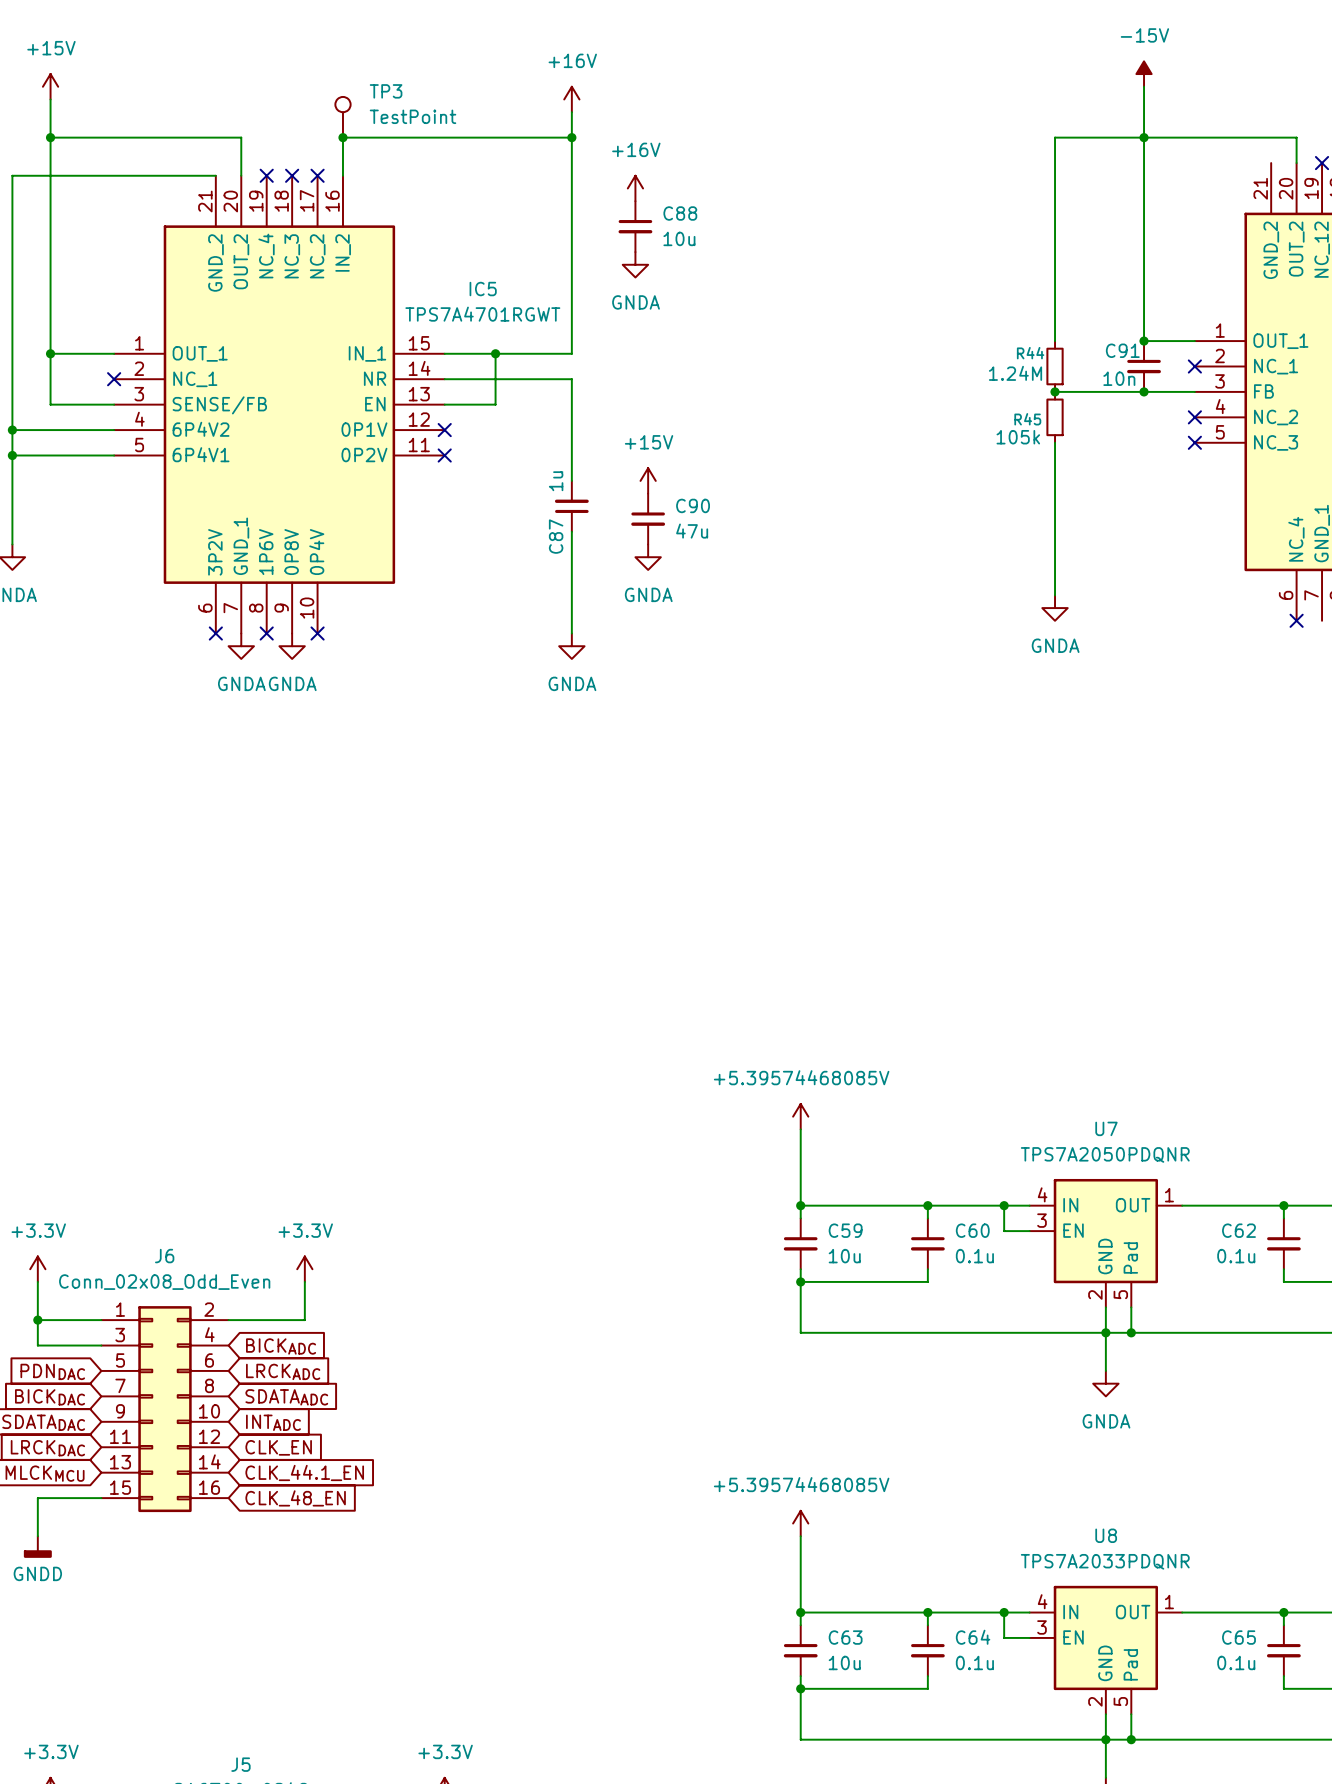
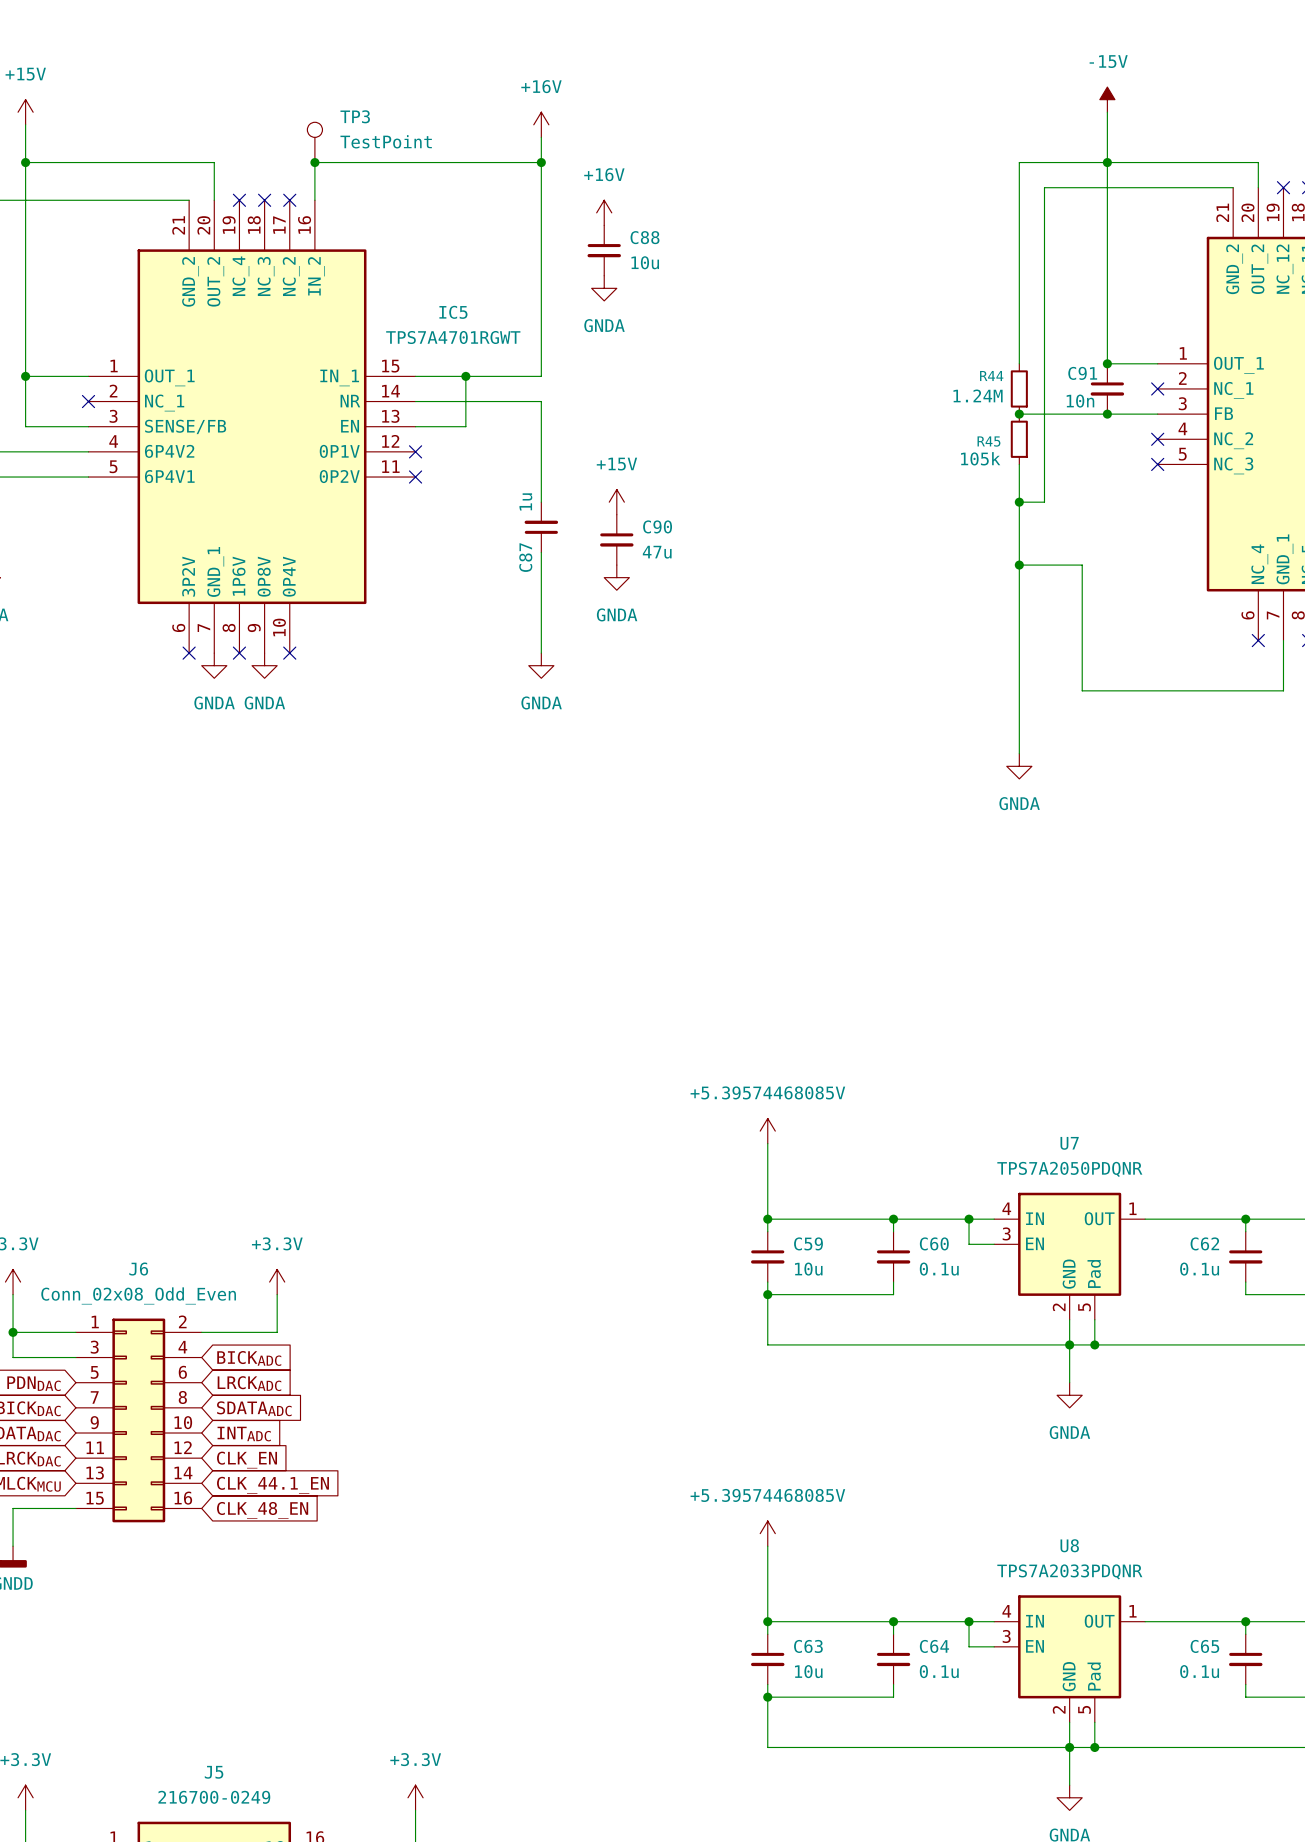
wire: none -> (1233, 187) (1044, 187) (1044, 502) (1019, 502)
junction: none -> (1019, 502)
wire: none -> (1019, 565) (1082, 565) (1082, 690) (1283, 690) (1283, 640)
junction: none -> (1019, 565)
wire: none -> (1019, 615) (1019, 753)
power symbol position: GNDA (1055, 608) -> GNDA (1019, 766)

